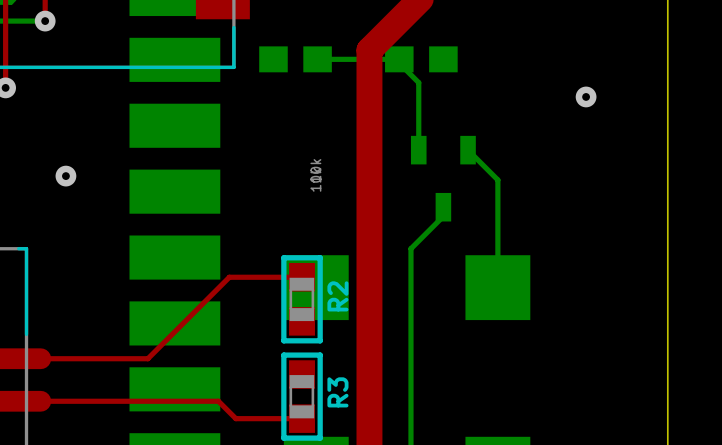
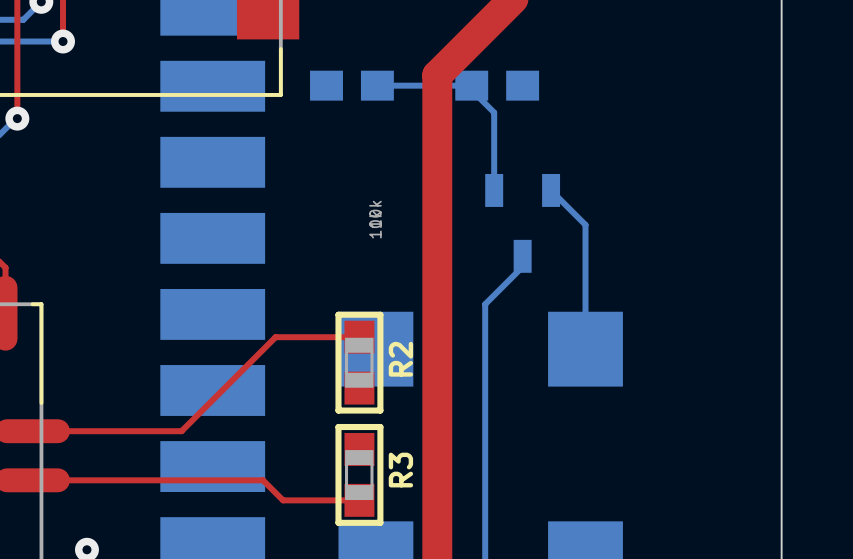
via: (586, 96) -> none
via: (65, 176) -> none

